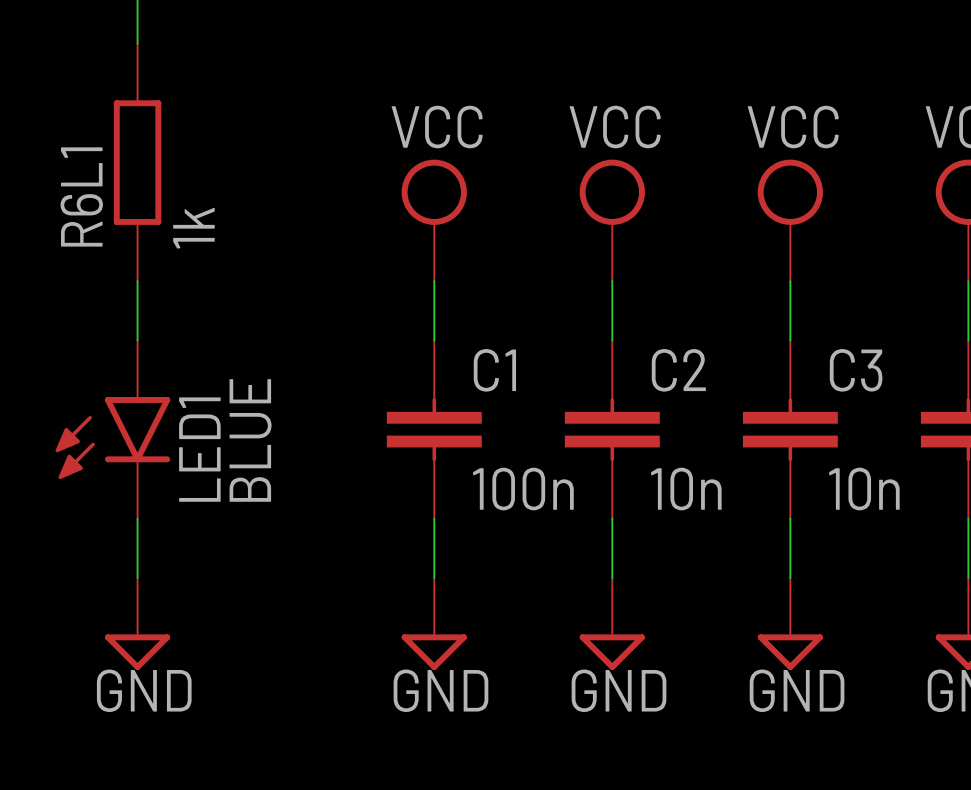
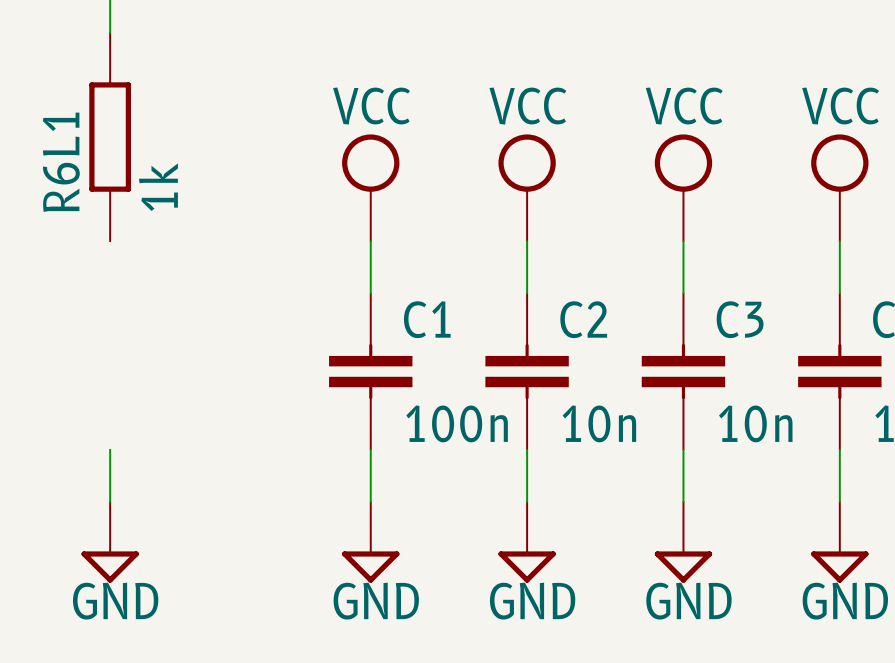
wire: (137, 281) (137, 340) -> none
LED1: BLUE (112, 429) -> none

